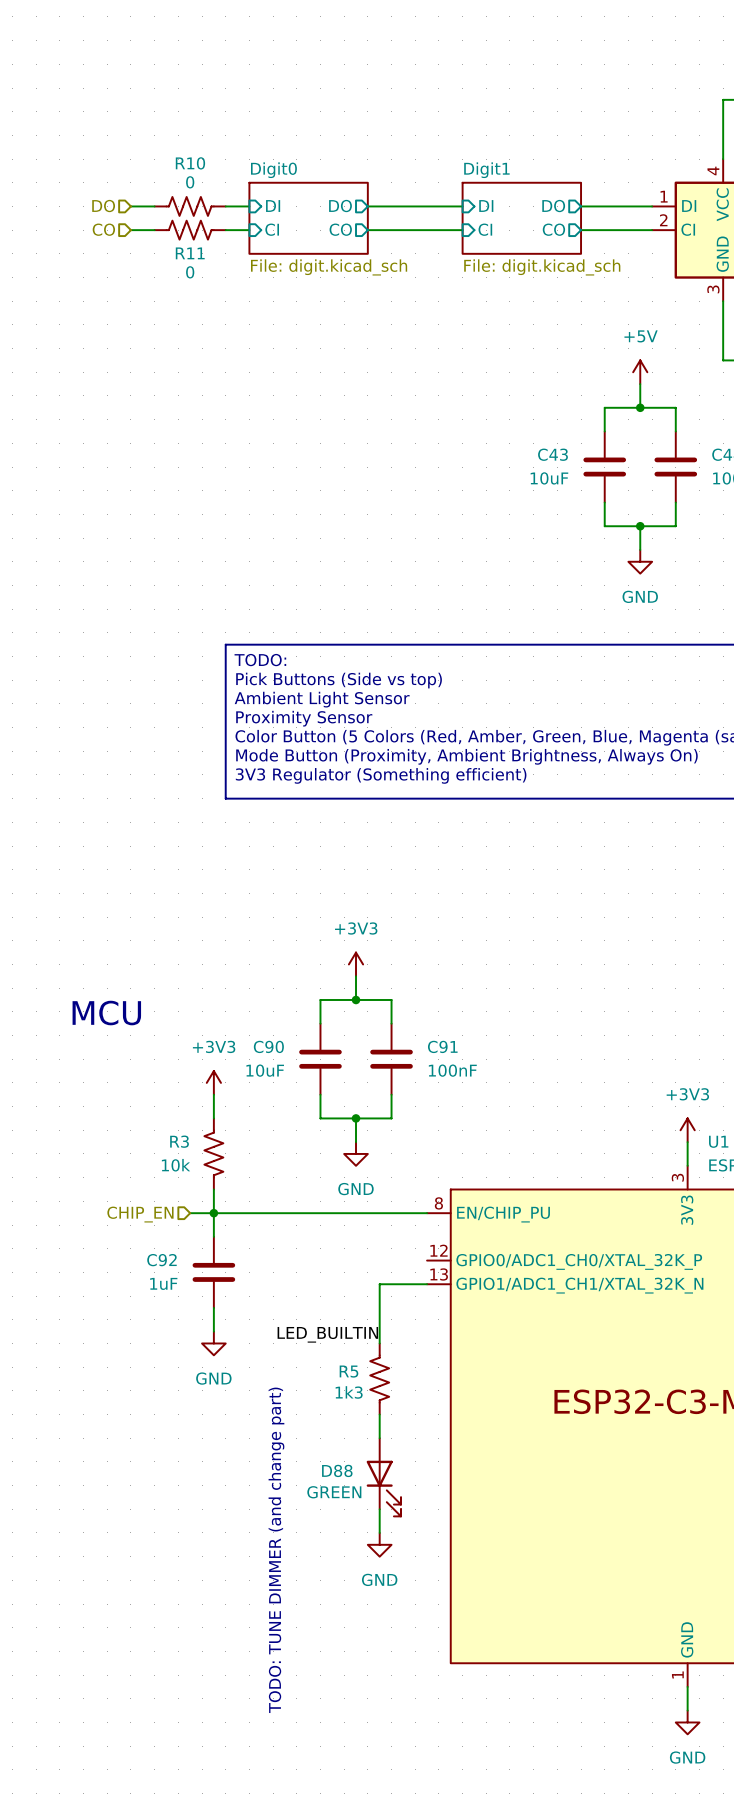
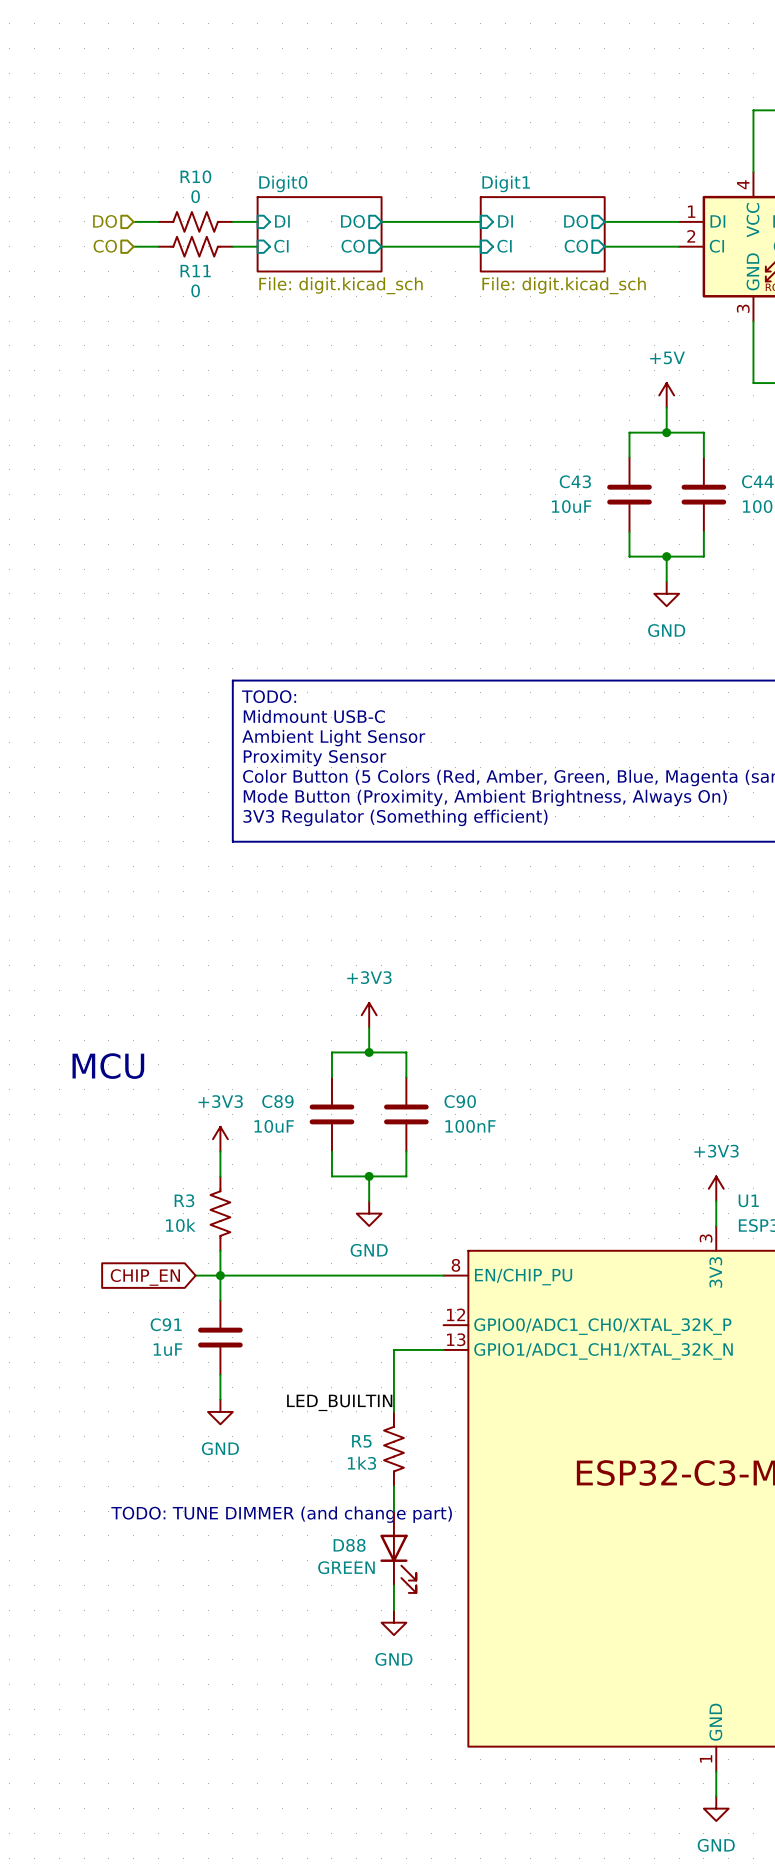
text: Pick Buttons (Side vs top) (339, 680) -> Midmount USB-C (314, 716)
C90 name: C90 (268, 1046) -> C89 (277, 1101)
C91 name: C91 (442, 1046) -> C90 (460, 1101)
hierarchical label: CHIP_EN (140, 1214) -> none
global label: none -> CHIP_EN (145, 1277)
C92 name: C92 (161, 1260) -> C91 (166, 1324)
text rotation: 0° (276, 1550) -> 90° clockwise (281, 1514)

